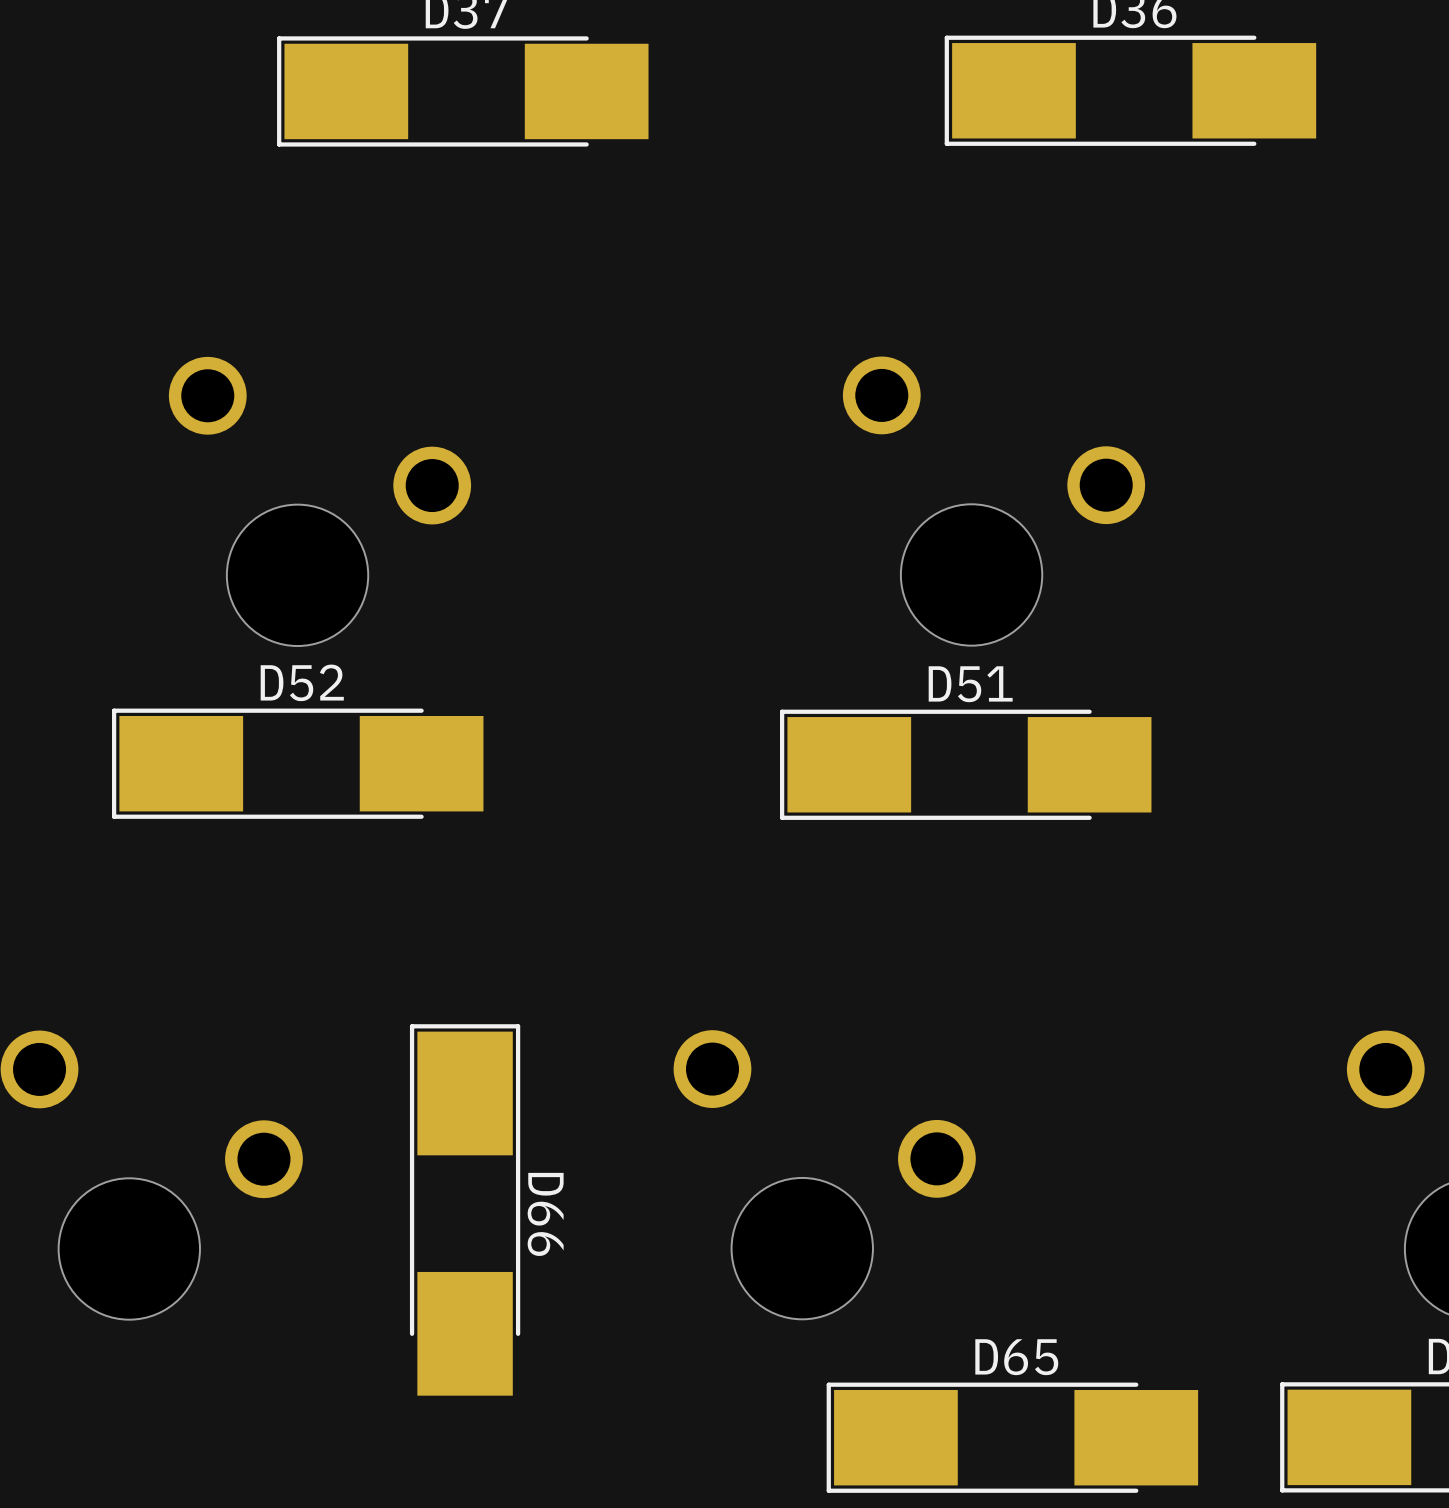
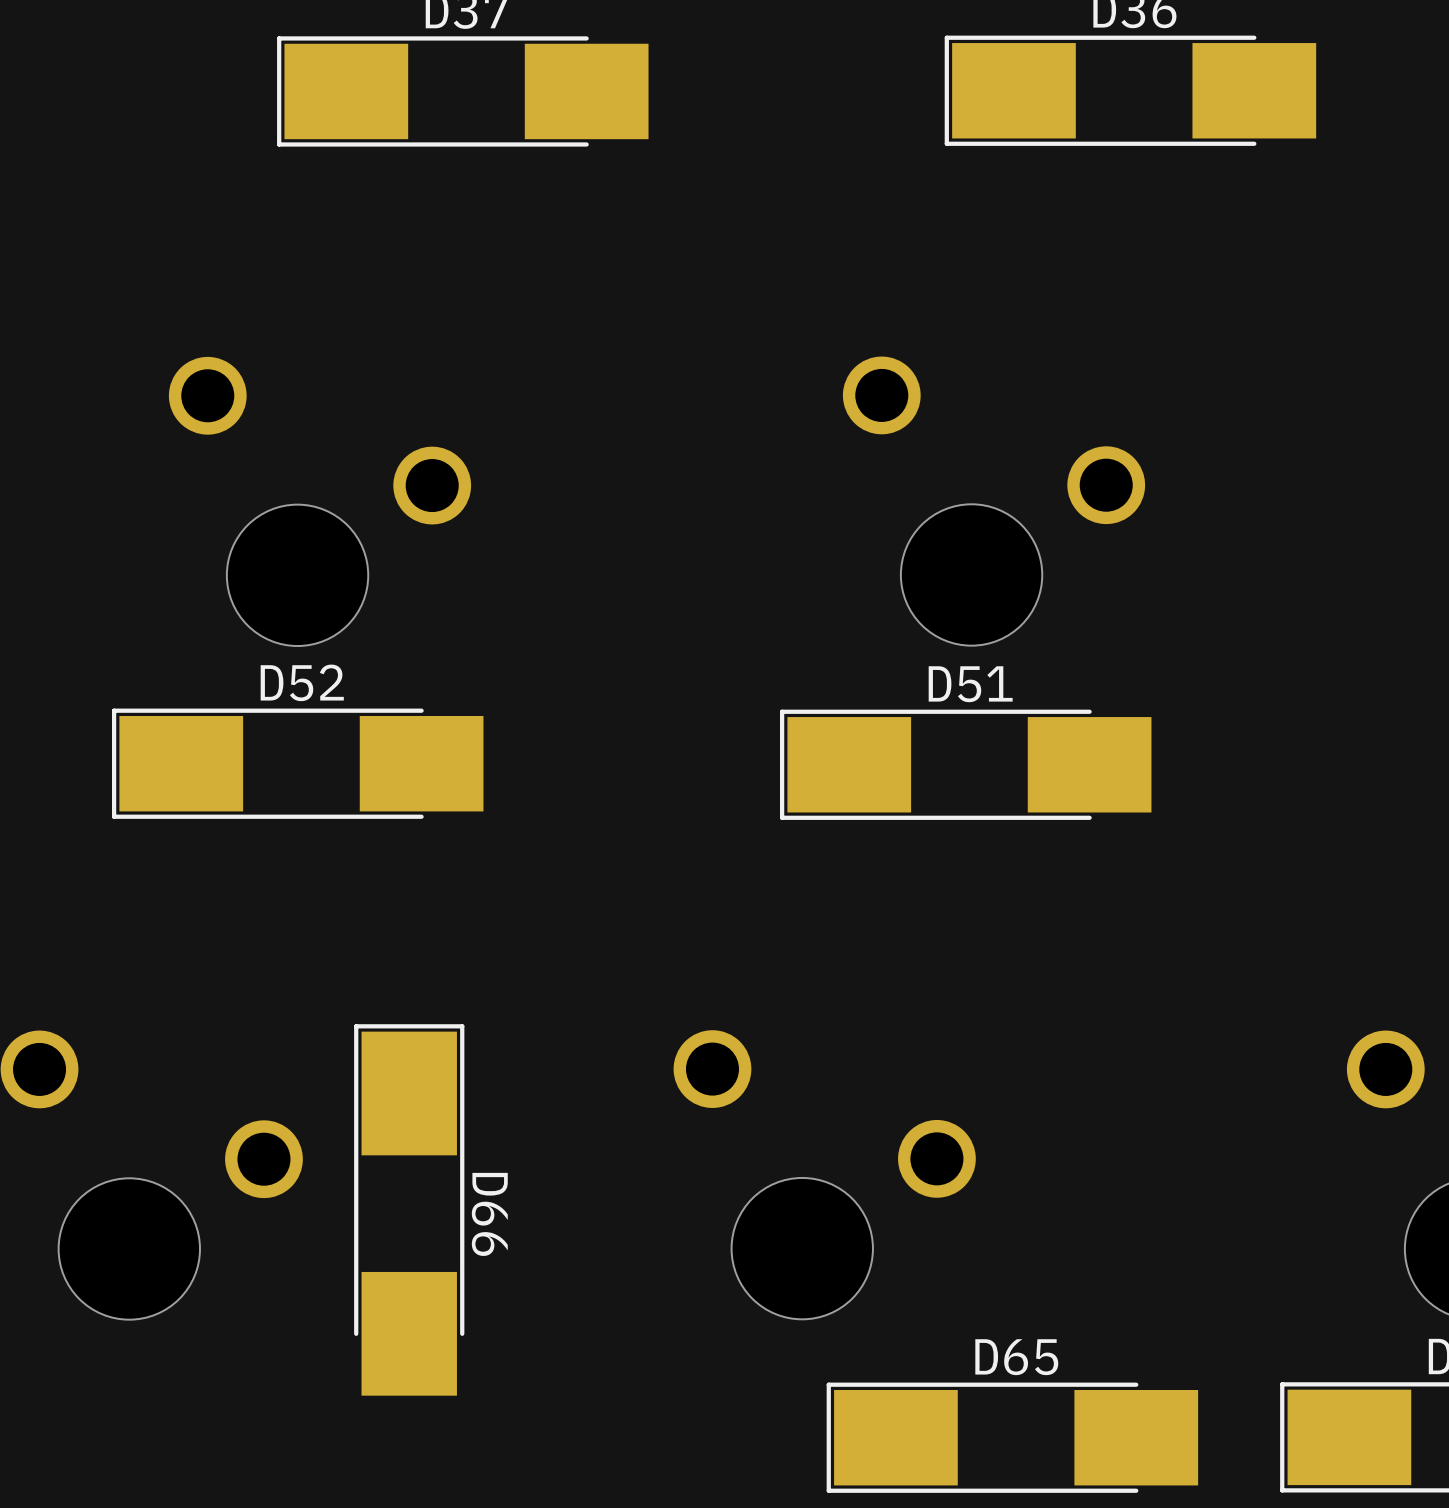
D66 position: (465, 1209) -> (409, 1209)

